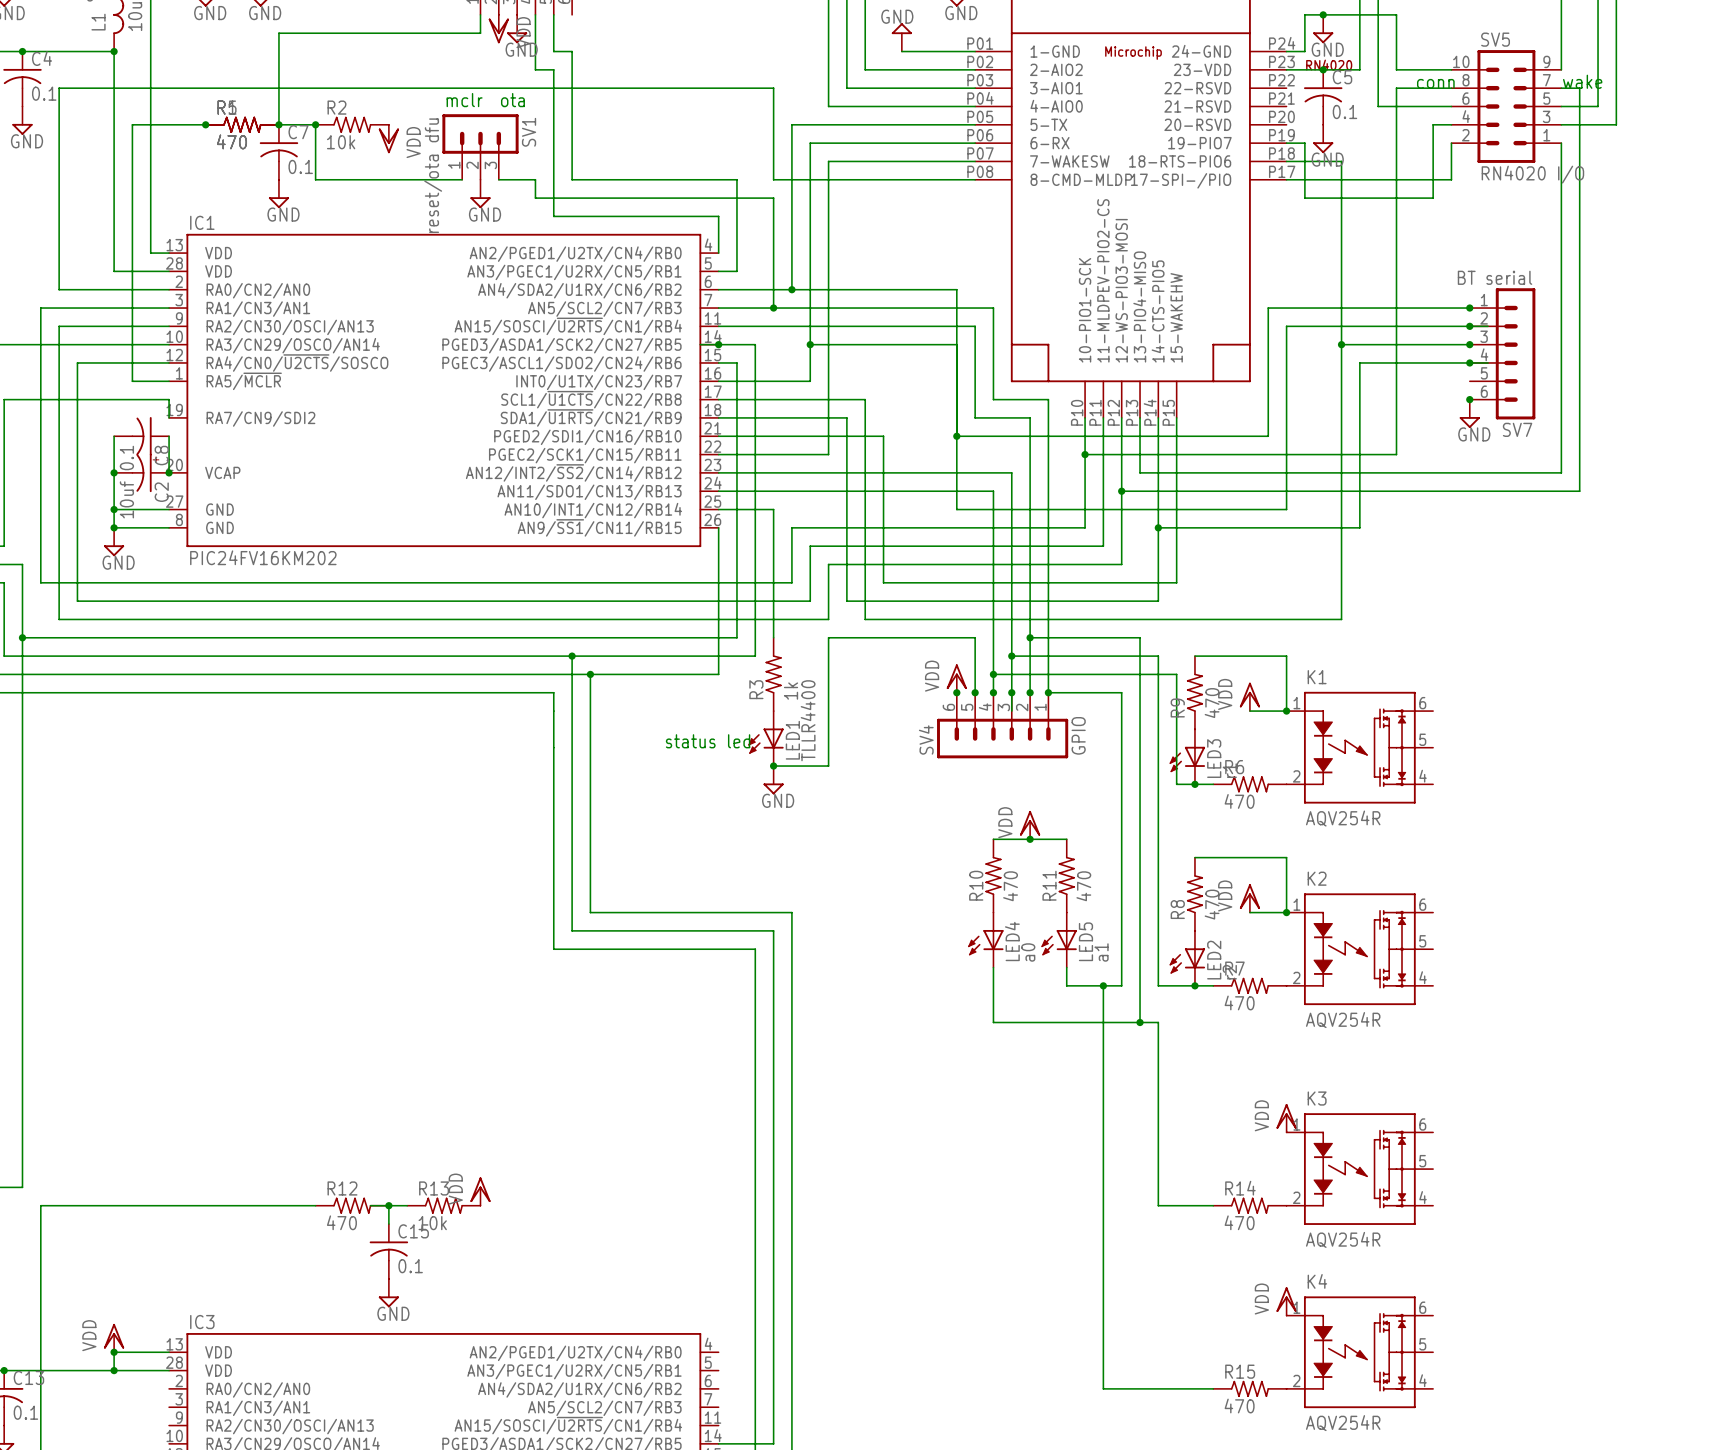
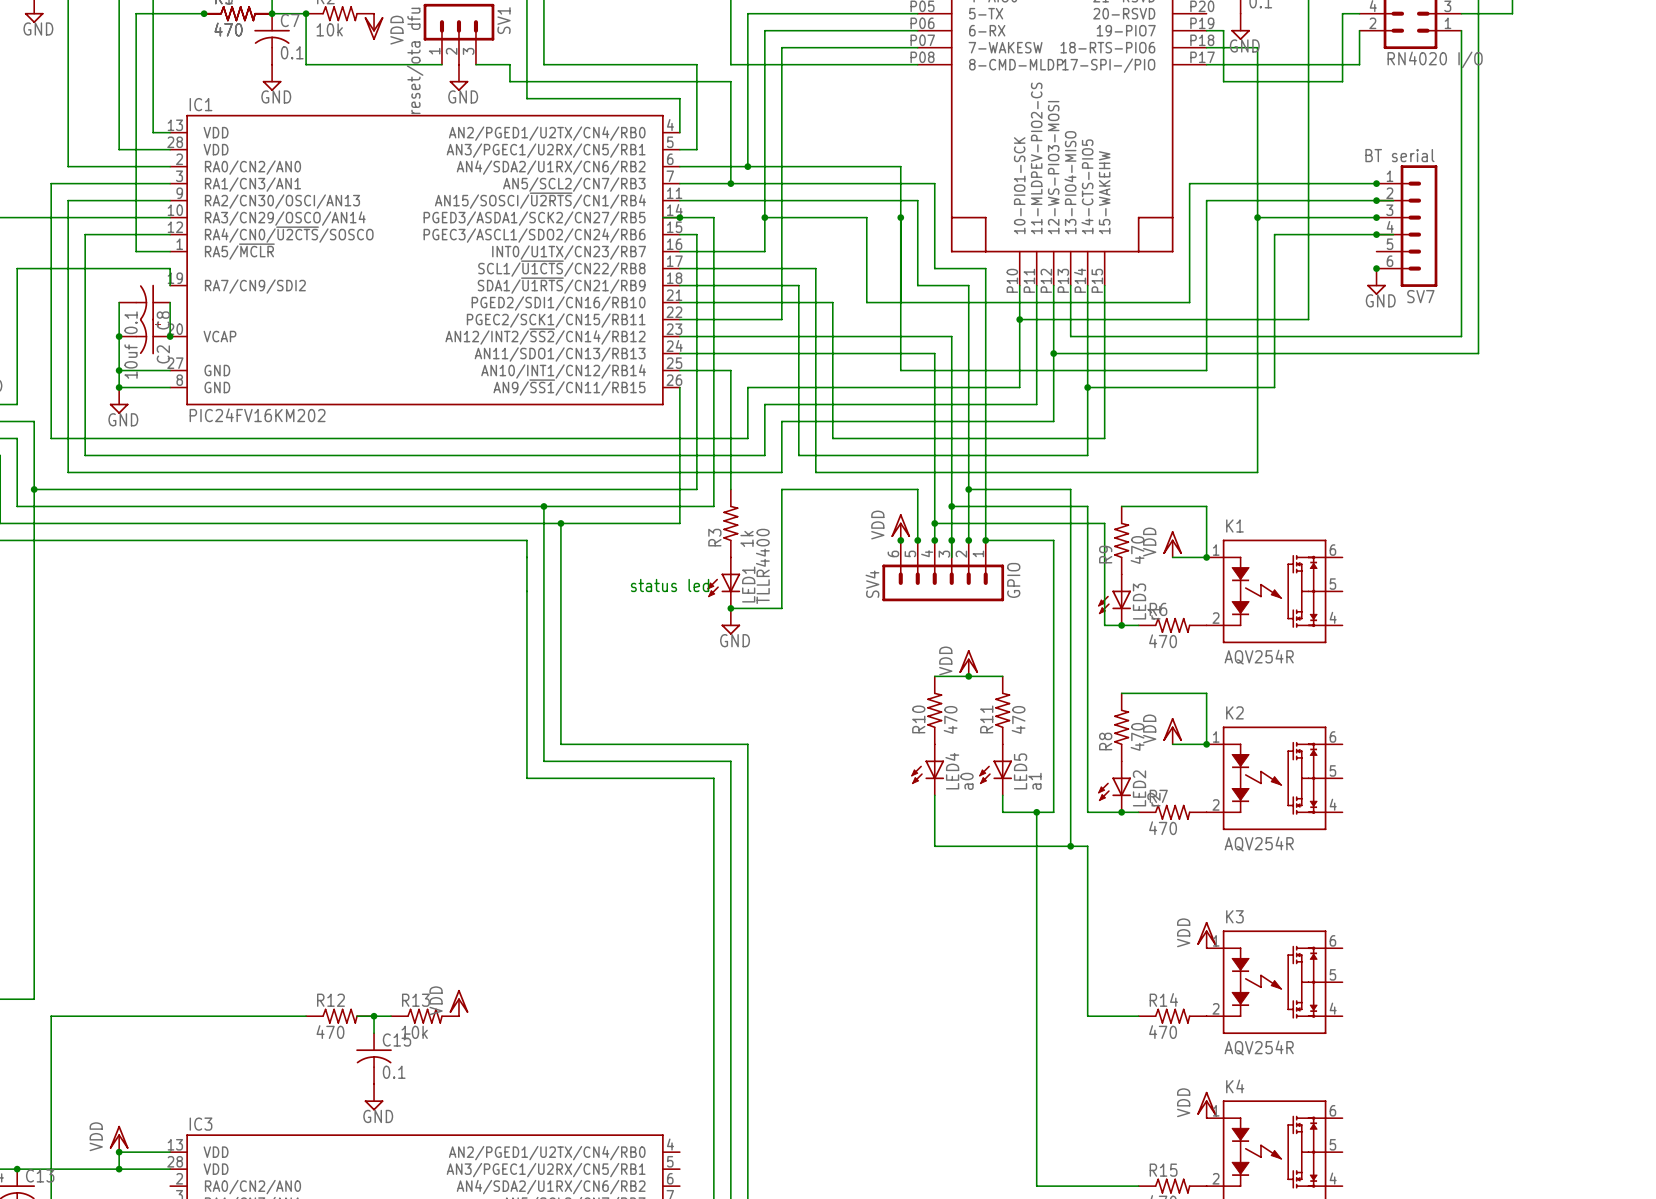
wire: (920, 344) (956, 344) -> (866, 217) (866, 302) (900, 302)
junction: none -> (900, 217)
junction: (956, 436) -> none

